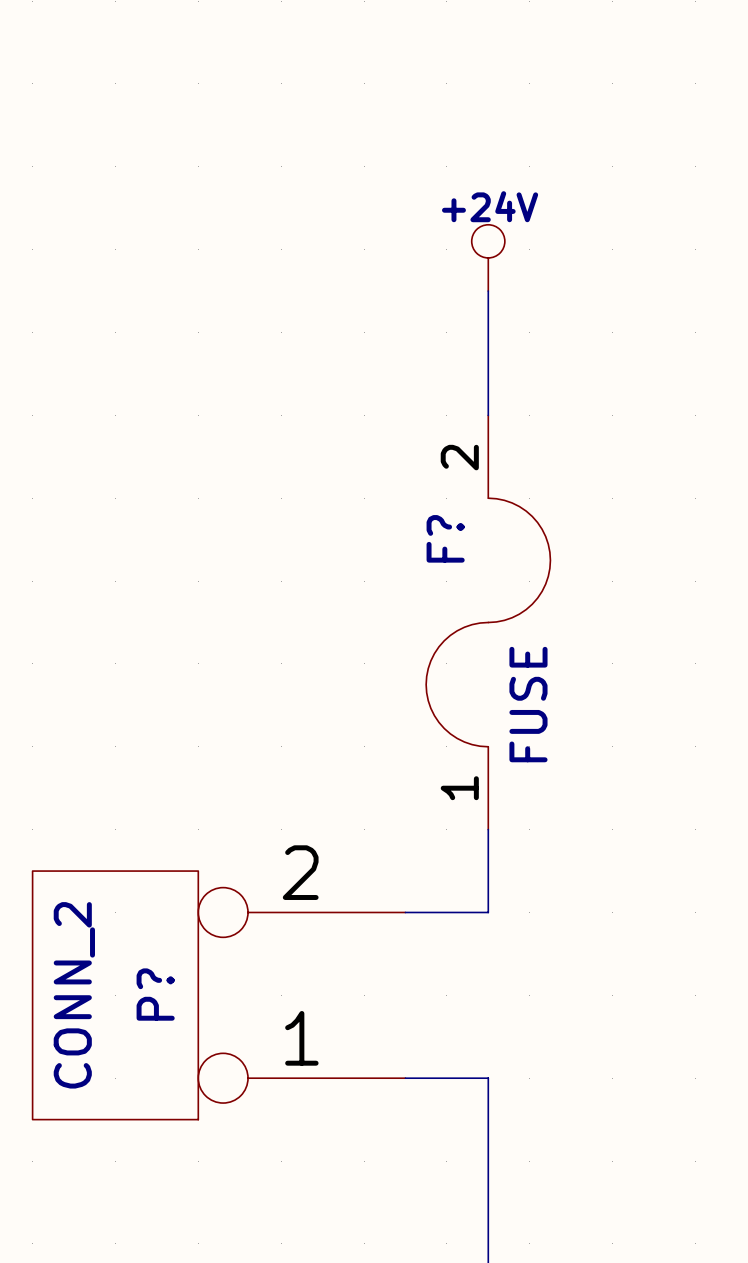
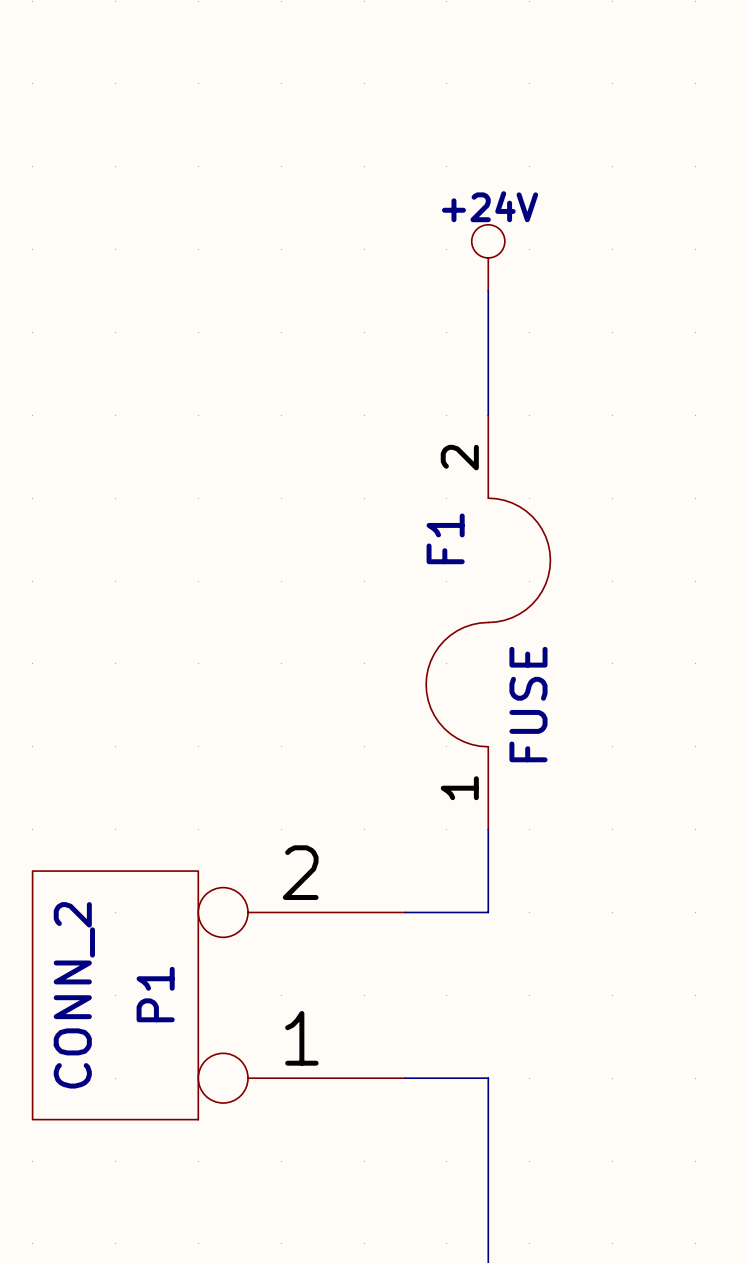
F? name: F? (445, 538) -> F1 (445, 538)
P? name: P? (155, 994) -> P1 (155, 994)

